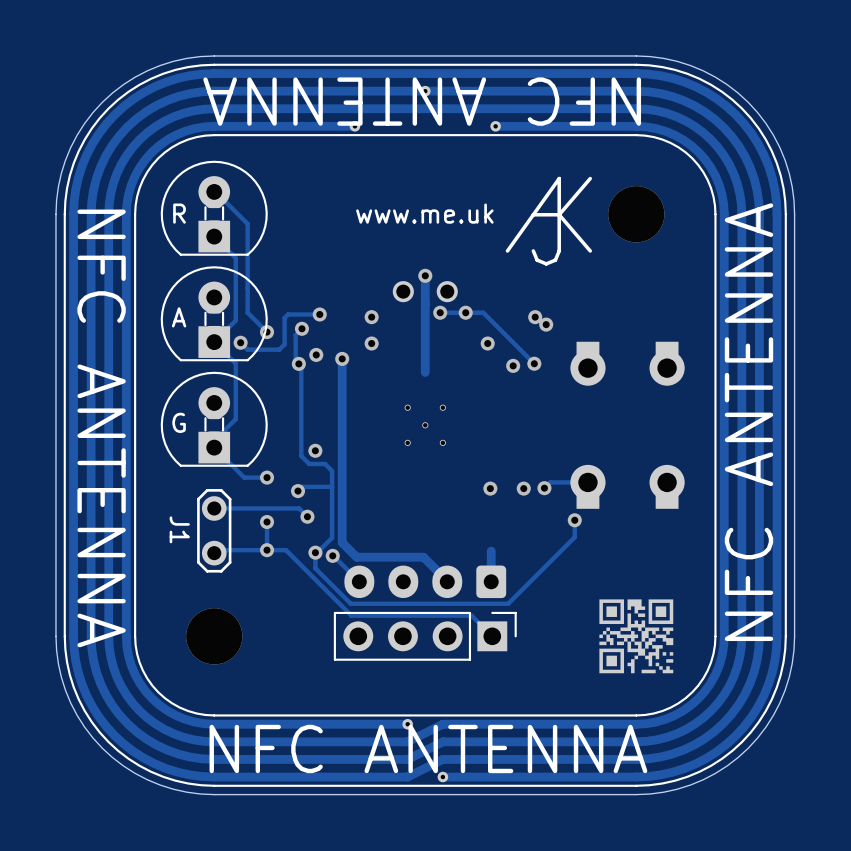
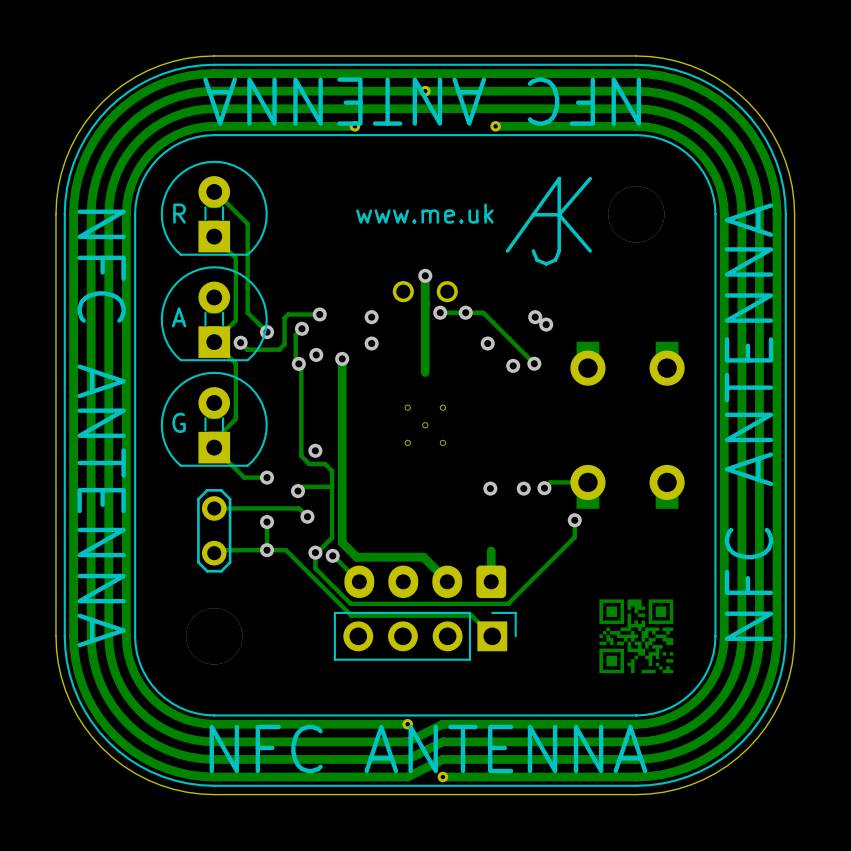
J1 name: J1 (179, 529) -> none

